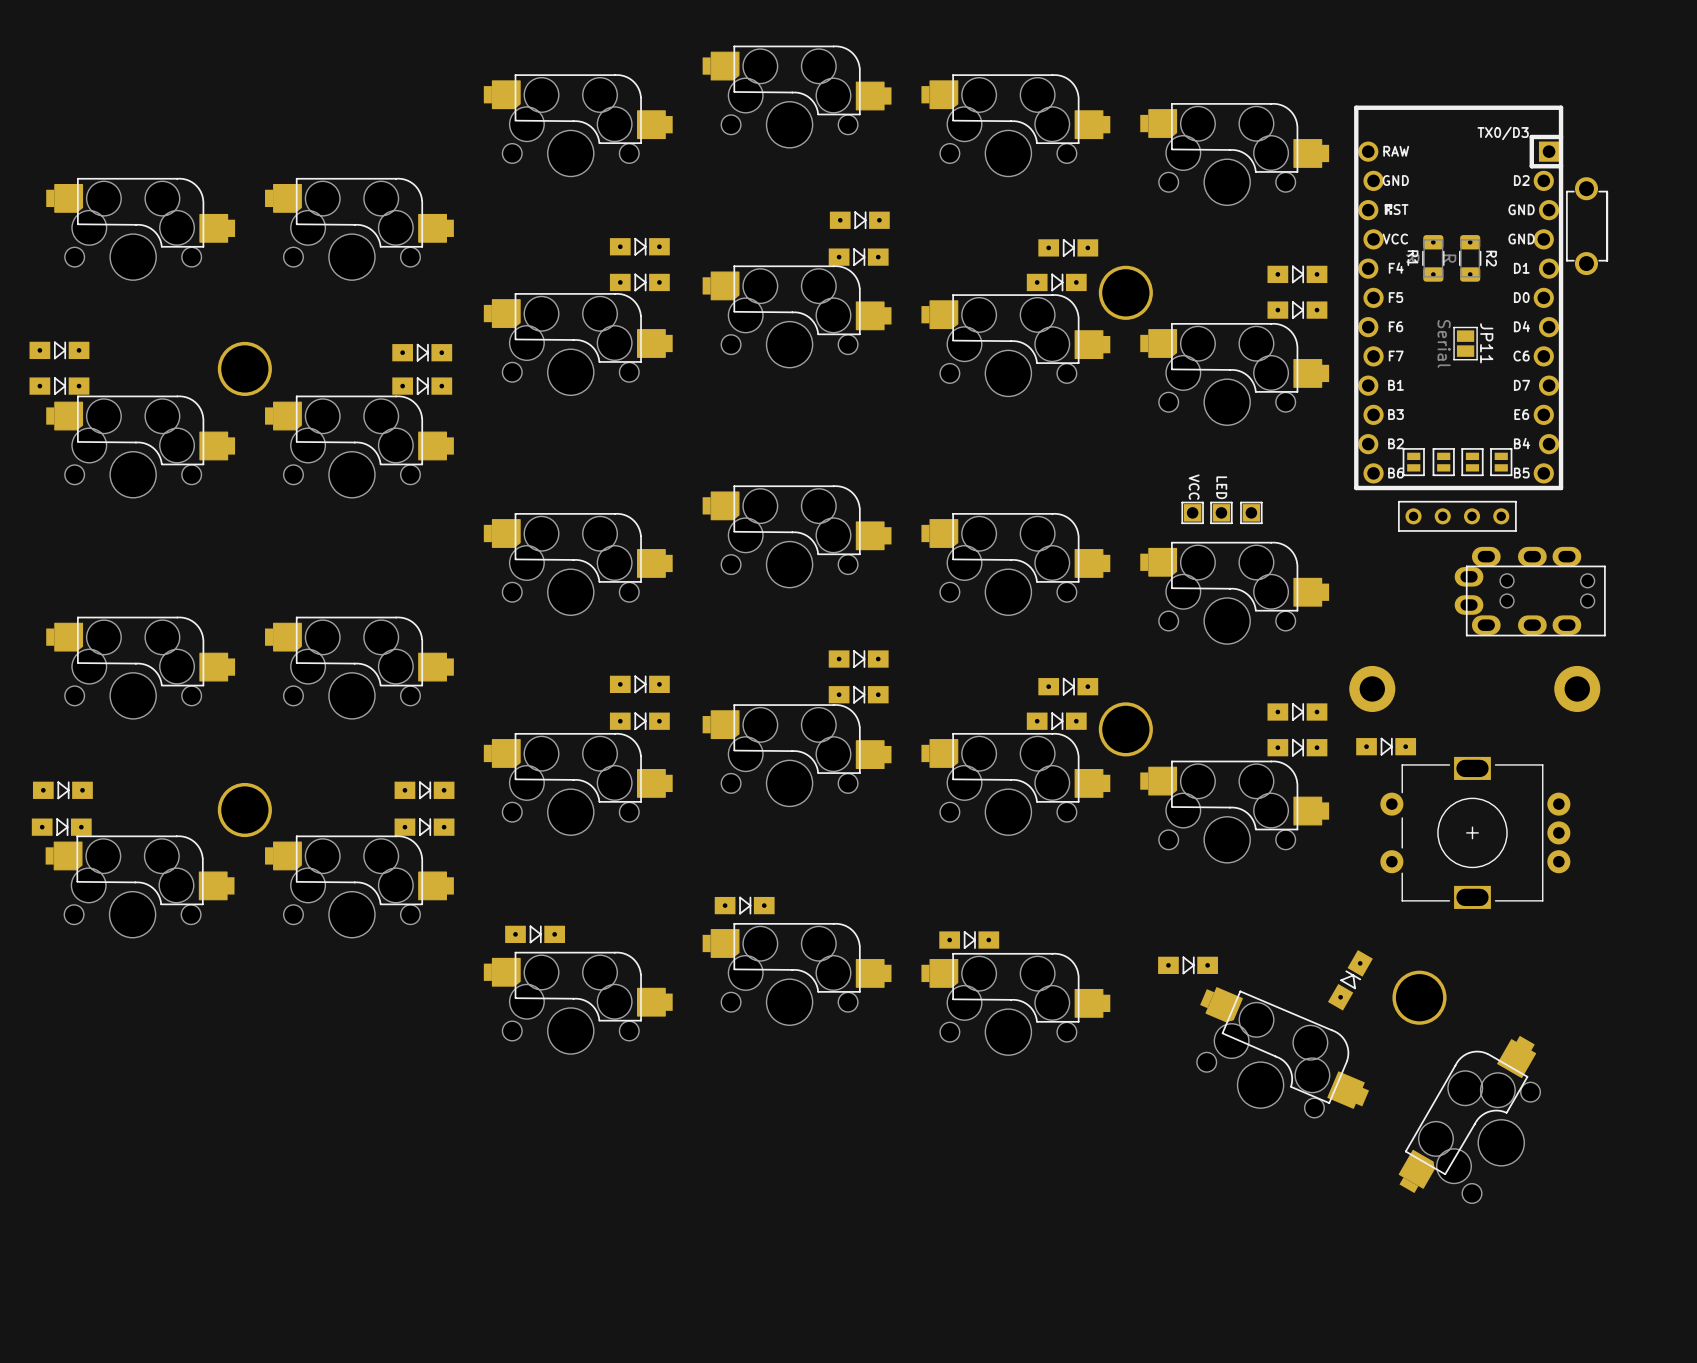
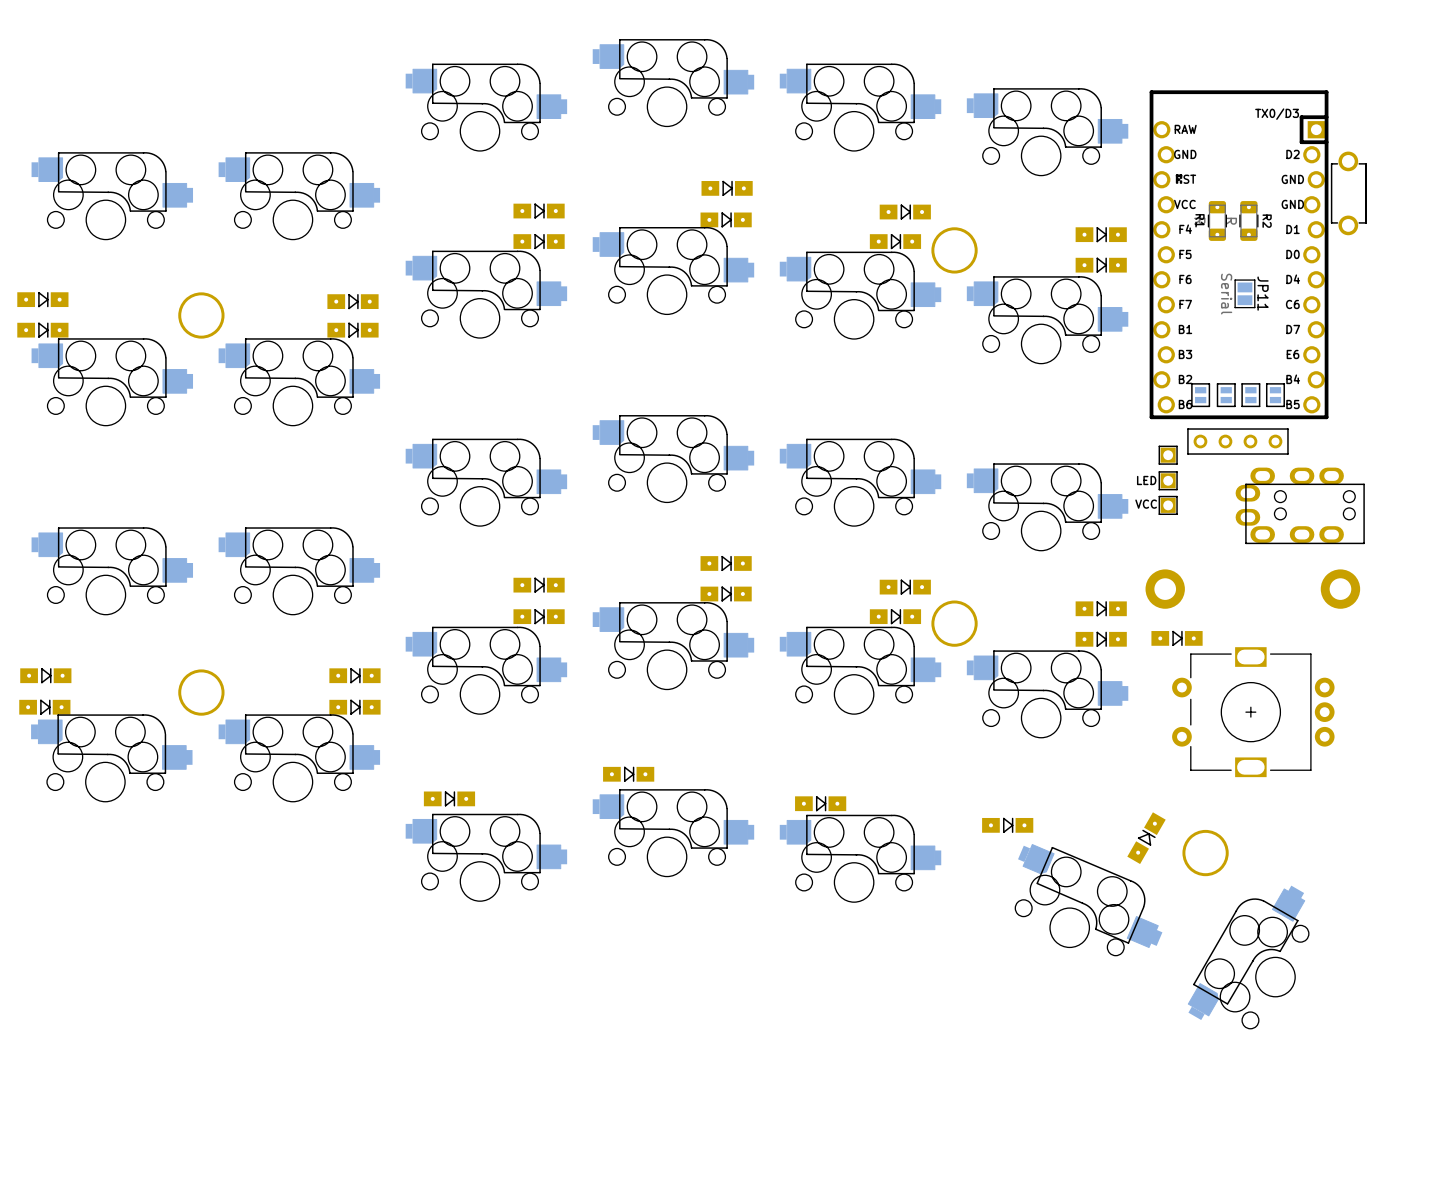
part rotation: 0° (1222, 512) -> 90° counterclockwise (1168, 480)
part position: (1222, 512) -> (1168, 480)

